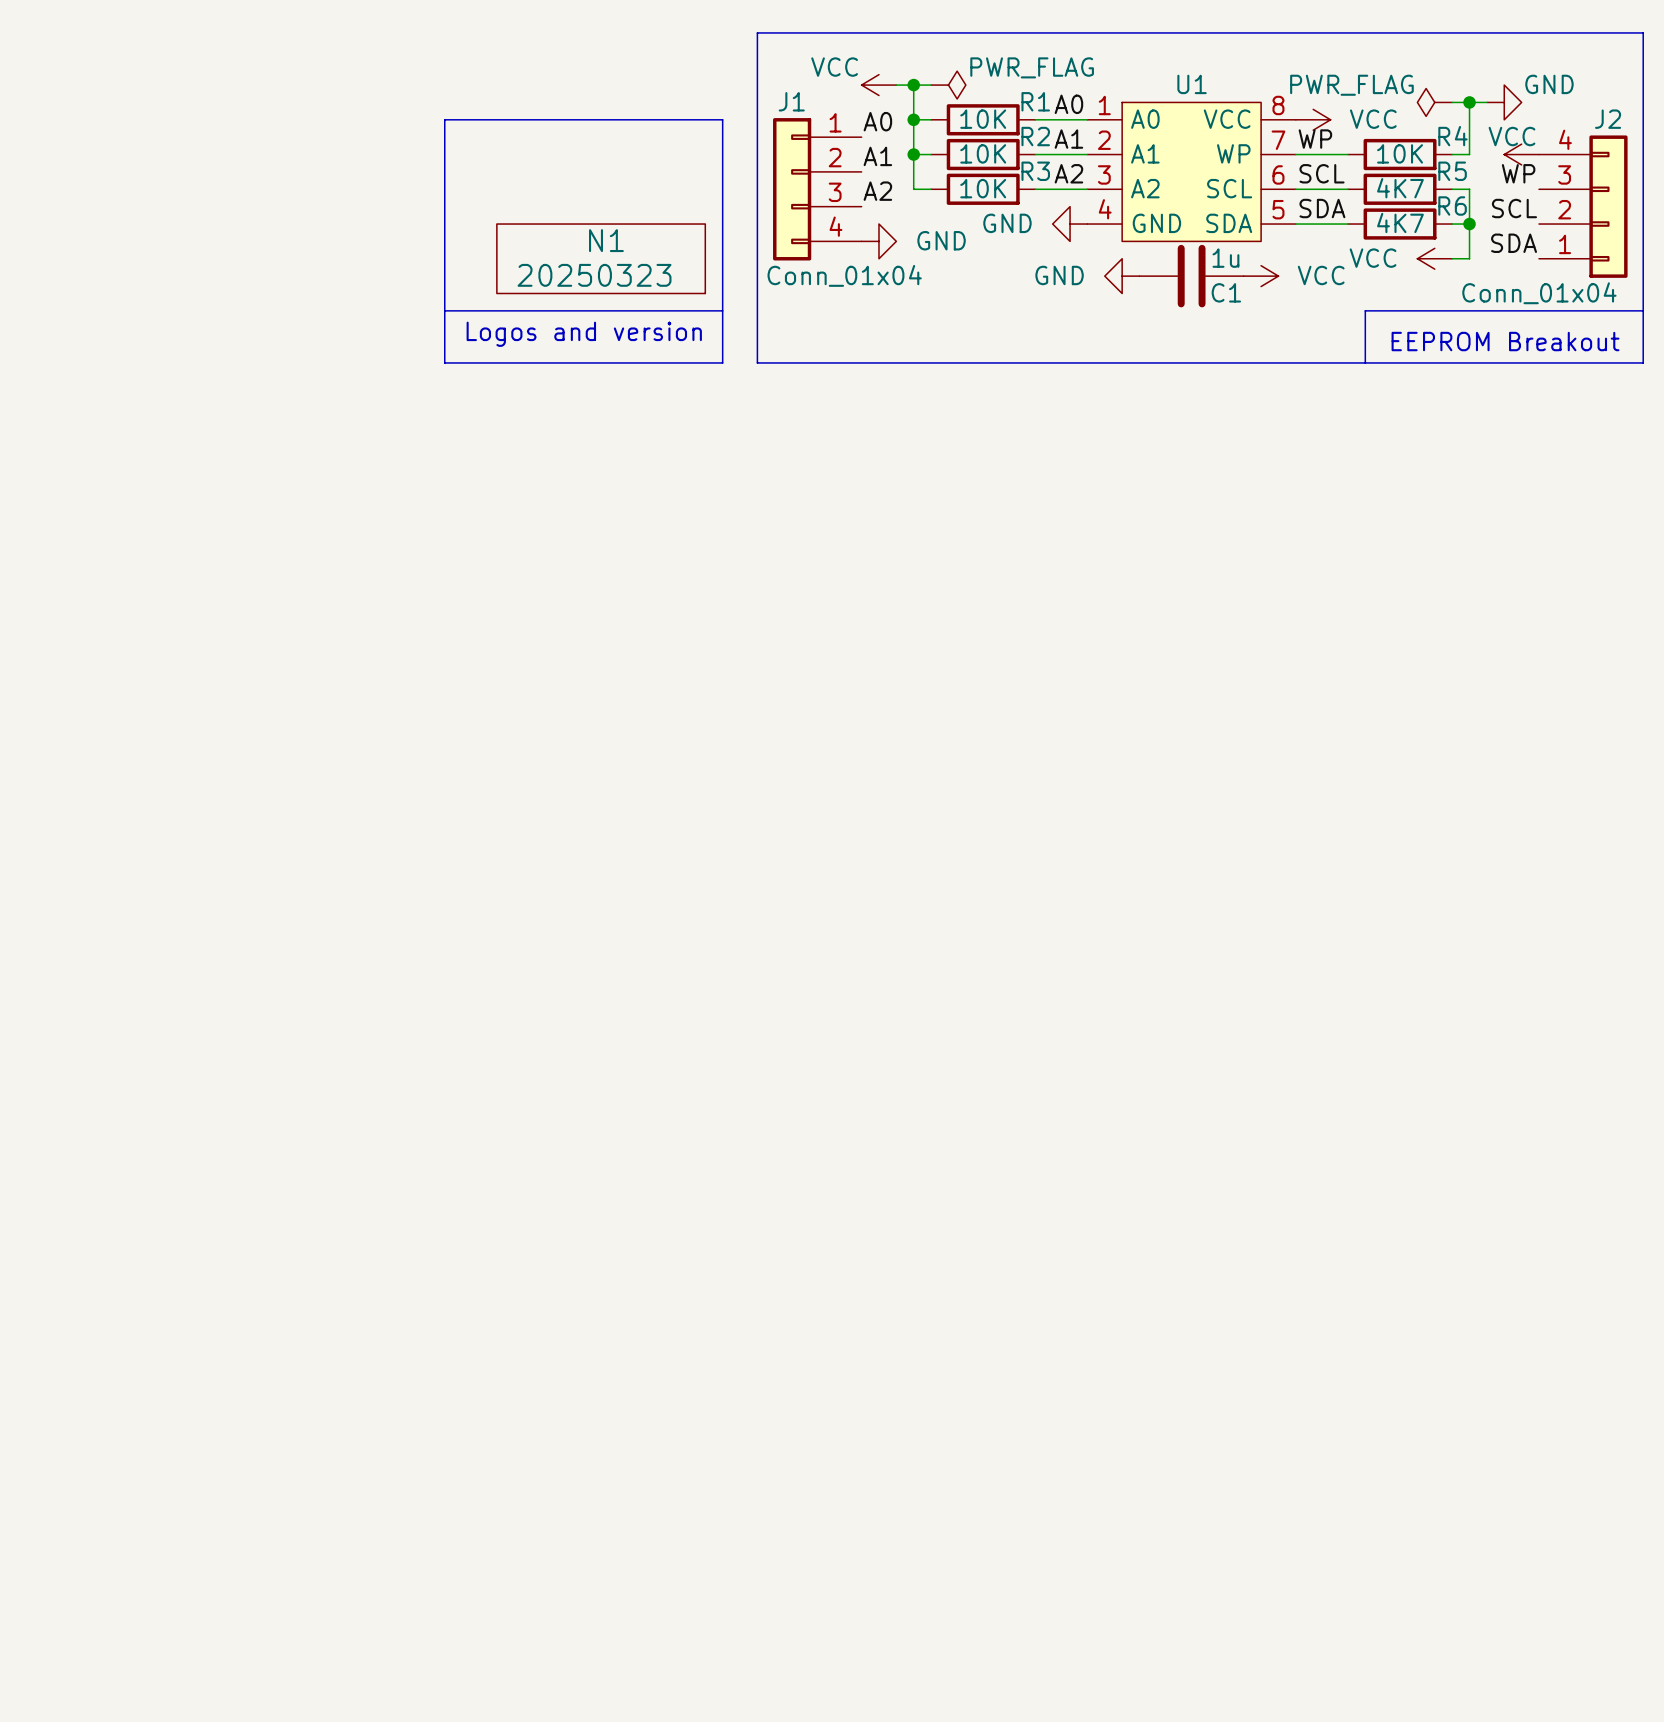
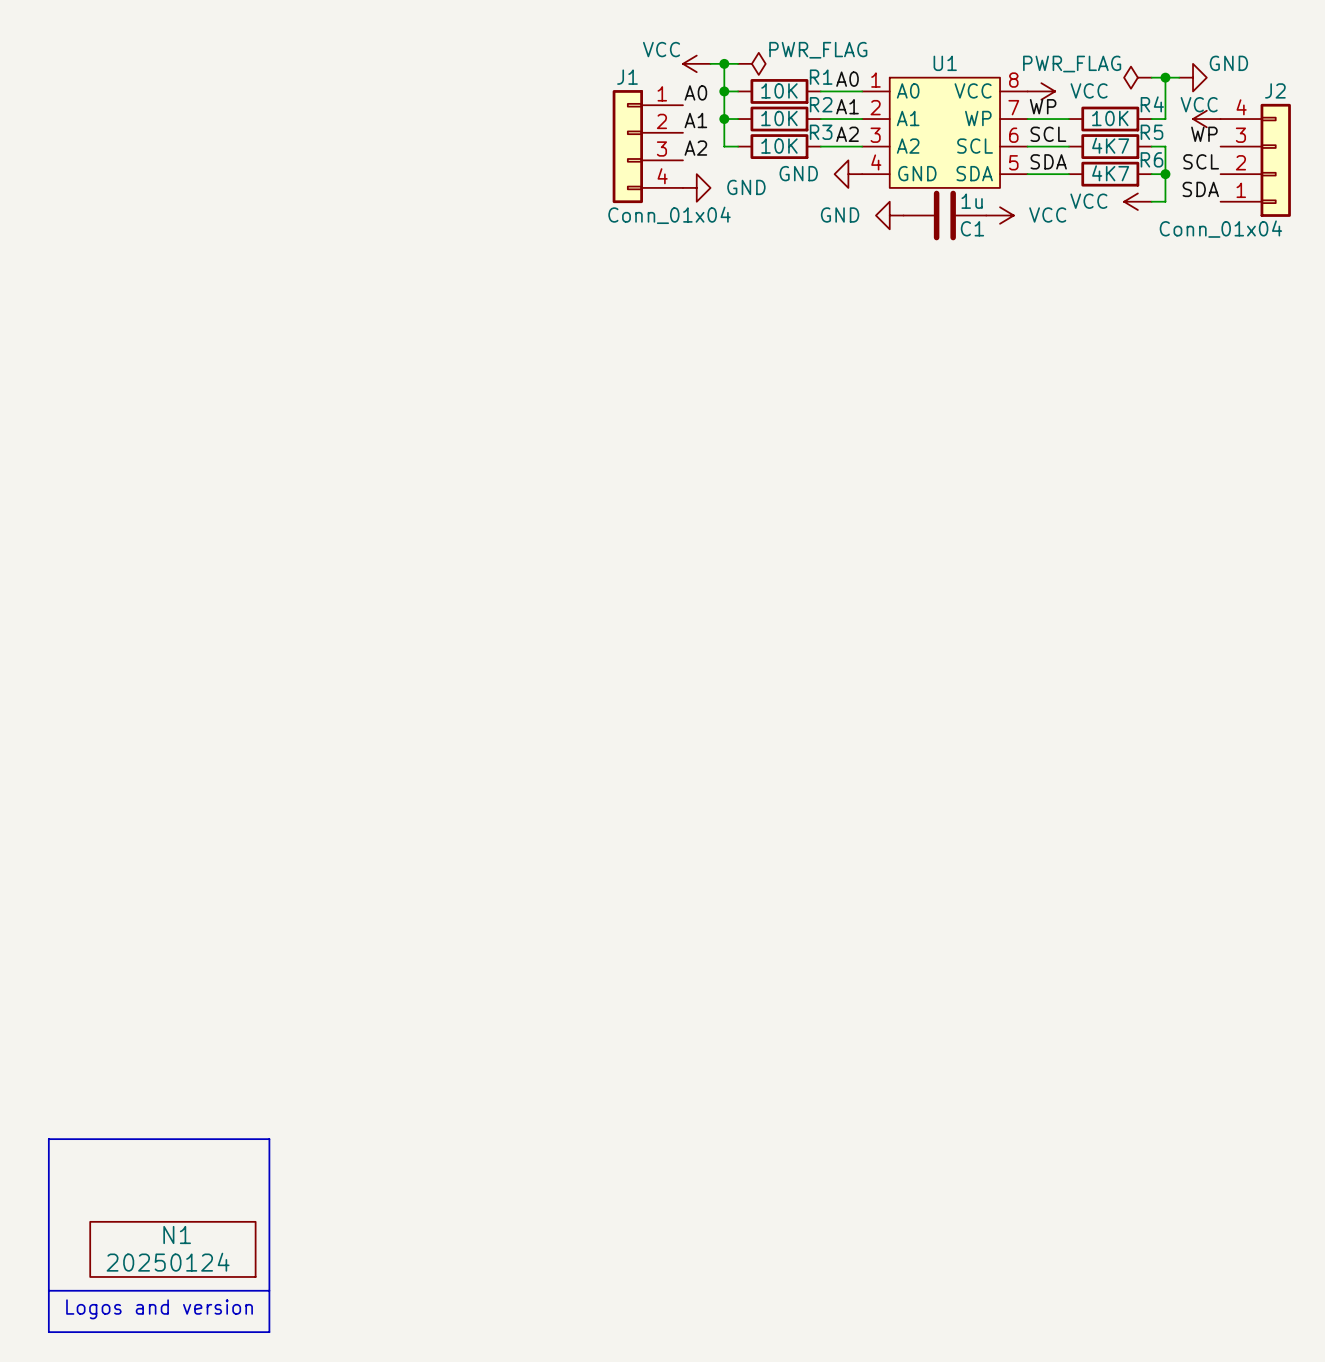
line: (757, 32) (1643, 32) (1643, 362) (757, 362) (757, 32) -> none
line: (444, 119) (444, 362) (722, 362) (722, 119) (444, 119) -> none
N1 position: (601, 258) -> (172, 1249)
N1 value: 20250323 (594, 275) -> 20250124 (168, 1262)
line: (444, 310) (722, 310) -> none
line: (1643, 310) (1365, 310) (1365, 362) -> none
text: Logos and version (584, 334) -> none
text: EEPROM Breakout (1505, 341) -> none
line: none -> (48, 1139) (48, 1332) (269, 1332) (269, 1139) (48, 1139)
line: none -> (48, 1290) (269, 1290)
text: none -> Logos and version (159, 1309)

